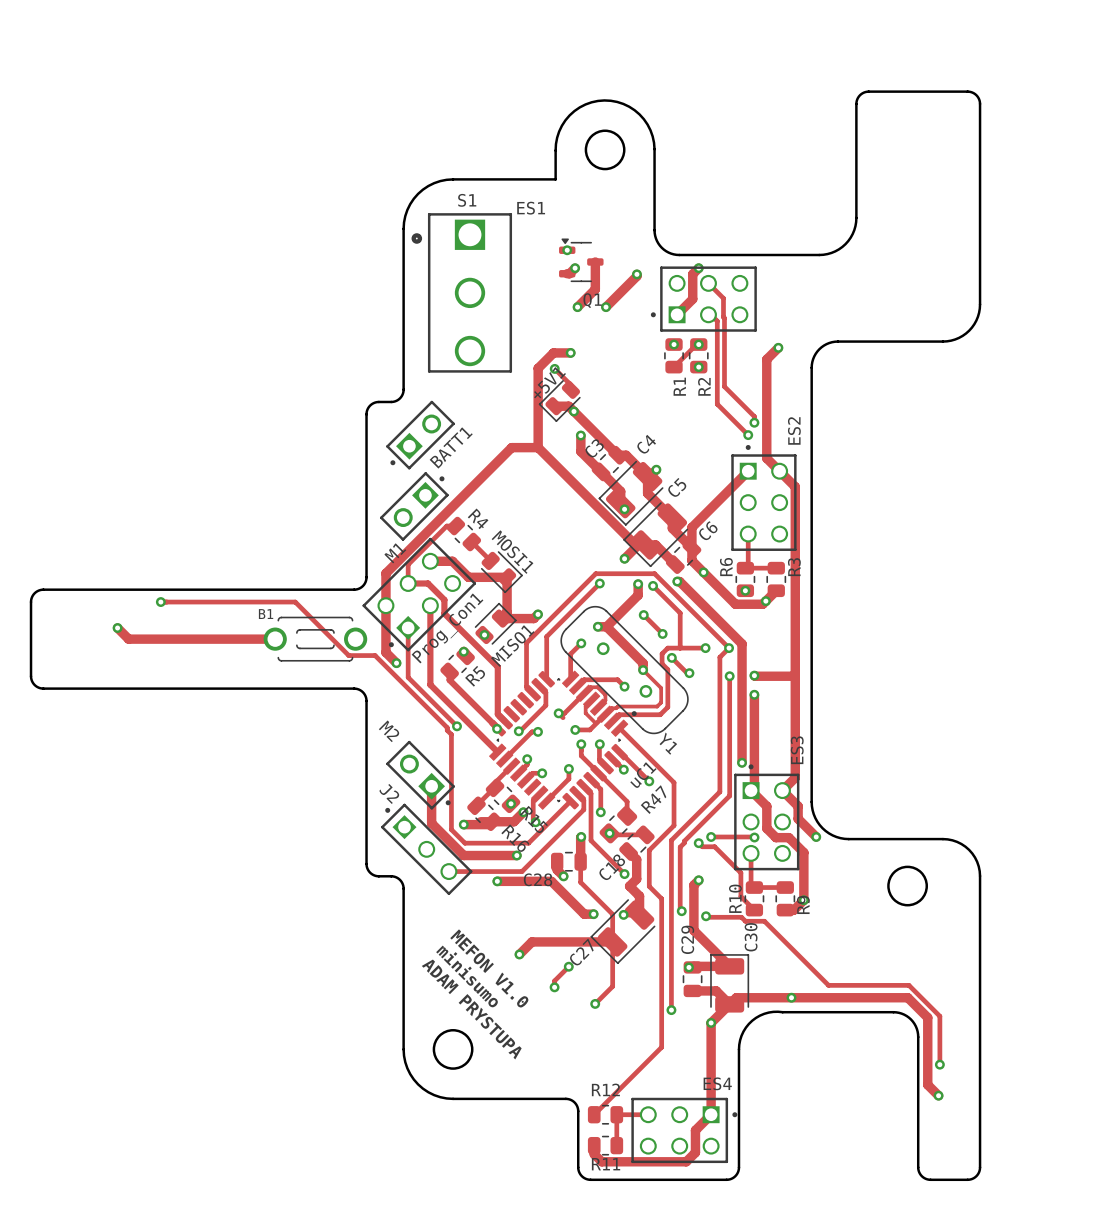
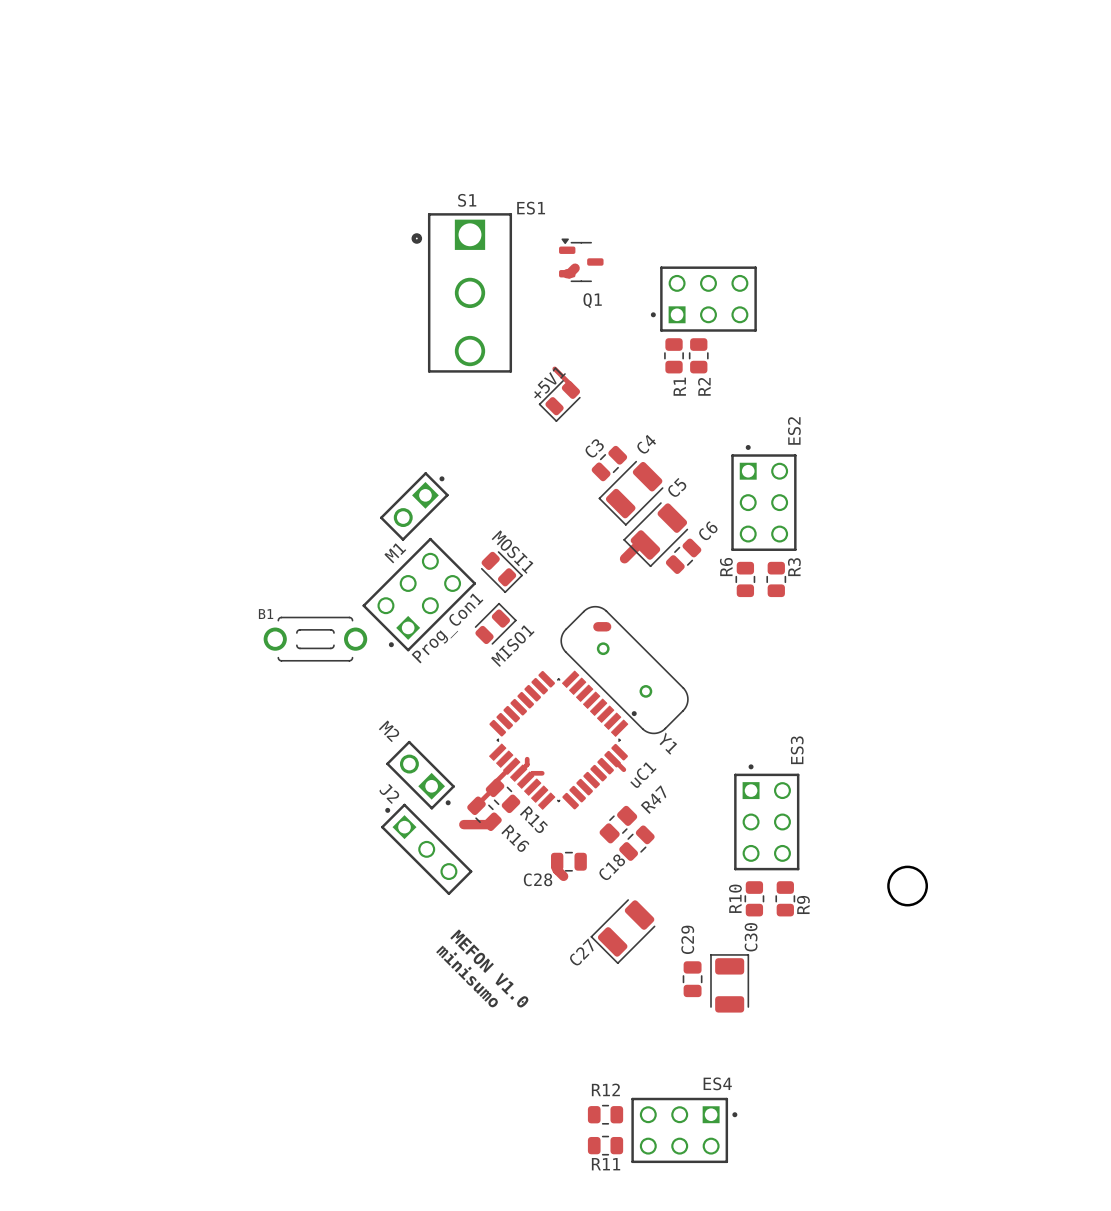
board edge: (868, 91) (967, 91) (973, 93) (978, 97) (980, 103) (979, 308) (971, 327) (955, 339) (942, 341) (835, 341) (821, 347) (813, 359) (811, 806) (819, 825) (836, 837) (848, 839) (947, 839) (965, 846) (977, 861) (980, 876) (979, 1170) (975, 1177) (967, 1179) (928, 1179) (923, 1177) (919, 1172) (918, 1034) (914, 1023) (908, 1017) (893, 1012) (778, 1011) (768, 1012) (755, 1017) (745, 1027) (740, 1040) (738, 1167) (735, 1176) (726, 1179) (587, 1179) (581, 1176) (578, 1169) (578, 1109) (572, 1100) (565, 1098) (446, 1098) (434, 1095) (422, 1088) (413, 1079) (407, 1068) (403, 1049) (403, 887) (397, 878) (374, 875) (370, 872) (366, 866) (366, 700) (362, 692) (354, 688) (40, 688) (34, 684) (31, 677) (31, 598) (35, 592) (43, 589) (354, 589) (360, 588) (364, 583) (366, 577) (366, 412) (372, 403) (395, 401) (399, 398) (403, 392) (404, 222) (407, 209) (418, 193) (434, 183) (446, 179) (555, 179) (555, 144) (559, 131) (565, 120) (574, 111) (585, 104) (597, 100) (610, 100) (623, 103) (634, 110) (643, 119) (650, 130) (654, 149) (654, 233) (658, 243) (666, 251) (679, 255) (827, 254) (845, 244) (855, 226) (856, 102) (859, 95) (868, 91) -> none
round board edge: [584, 129, 626, 171] -> none
via: (567, 250) -> none
track: (595, 261) (595, 289) (577, 307) -> none
via: (575, 268) -> none
track: (698, 268) (692, 274) (692, 299) (677, 314) -> none
via: (698, 268) -> none
track: (636, 274) (606, 307) -> none
via: (636, 274) -> none
track: (708, 283) (723, 298) (724, 386) (754, 416) (754, 422) -> none
via: (577, 307) -> none
via: (606, 307) -> none
track: (708, 314) (717, 321) (717, 404) (748, 435) -> none
via: (674, 344) -> none
track: (698, 344) (674, 367) -> none
via: (698, 344) -> none
track: (778, 347) (766, 359) (766, 458) (795, 486) (795, 777) (782, 790) (798, 806) (798, 818) (816, 836) -> none
via: (778, 347) -> none
track: (570, 352) (553, 352) (538, 368) (538, 447) -> none
via: (570, 352) -> none
via: (698, 367) -> none
via: (554, 368) -> none
track: (554, 406) (568, 406) (617, 455) (626, 455) (647, 476) -> none
via: (573, 411) -> none
via: (754, 422) -> none
BATT1: (420, 435) -> none
track: (580, 435) (580, 451) (620, 491) (620, 503) -> none
via: (580, 435) -> none
via: (748, 435) -> none
track: (538, 447) (635, 545) (655, 545) (675, 564) -> none
track: (538, 447) (511, 447) (385, 573) (385, 652) (396, 663) -> none
via: (656, 469) -> none
track: (748, 471) (691, 527) (691, 560) (735, 604) (762, 604) (776, 590) -> none
track: (647, 476) (647, 493) (672, 518) (672, 528) (691, 547) -> none
via: (624, 509) -> none
track: (455, 526) (446, 526) (408, 564) (408, 583) (428, 583) (444, 599) (444, 613) (497, 666) (497, 714) (504, 721) -> none
R4: (463, 534) -> none
track: (748, 534) (748, 565) (745, 568) (776, 568) -> none
track: (471, 542) (490, 560) -> none
via: (624, 558) -> none
track: (430, 561) (452, 561) (468, 577) (507, 577) (507, 612) (500, 618) (533, 618) (538, 614) -> none
via: (703, 572) -> none
track: (677, 581) (679, 581) (742, 643) (742, 762) -> none
via: (677, 581) -> none
track: (599, 583) (546, 636) (546, 679) -> none
via: (599, 583) -> none
track: (638, 584) (638, 595) (606, 626) (643, 663) (643, 670) (661, 688) (661, 702) (657, 706) (611, 708) (595, 722) (585, 713) (585, 706) (591, 700) -> none
via: (638, 584) -> none
track: (653, 585) (680, 613) (680, 648) -> none
via: (653, 585) -> none
via: (745, 590) -> none
via: (765, 601) -> none
track: (160, 602) (295, 602) (348, 655) (375, 655) (447, 727) (451, 734) (451, 829) (464, 843) (528, 843) (570, 801) -> none
via: (160, 602) -> none
track: (430, 605) (430, 684) (497, 752) -> none
via: (538, 614) -> none
track: (643, 615) (662, 633) -> none
via: (643, 615) -> none
via: (597, 626) -> none
track: (408, 627) (408, 677) (457, 726) -> none
track: (117, 628) (128, 639) (275, 639) -> none
via: (117, 628) -> none
via: (662, 633) -> none
via: (484, 634) -> none
track: (581, 643) (570, 654) (570, 679) -> none
via: (581, 643) -> none
track: (705, 648) (667, 648) (662, 653) (662, 663) (667, 669) (667, 707) (660, 714) (619, 714) (612, 721) -> none
via: (705, 648) -> none
via: (729, 648) -> none
via: (463, 651) -> none
track: (671, 657) (687, 673) (689, 673) -> none
via: (671, 657) -> none
via: (396, 663) -> none
R5: (457, 663) -> none
via: (643, 670) -> none
track: (449, 671) (449, 680) (497, 728) -> none
via: (689, 673) -> none
track: (754, 675) (795, 676) -> none
via: (754, 675) -> none
track: (729, 676) (729, 795) (680, 847) (680, 909) (681, 911) -> none
via: (729, 676) -> none
track: (539, 686) (545, 692) (545, 705) (518, 731) -> none
track: (577, 686) (584, 679) (617, 679) (624, 686) -> none
via: (624, 686) -> none
track: (532, 693) (526, 687) (526, 642) (595, 573) (654, 573) (729, 648) (719, 657) (719, 791) (671, 840) (671, 1010) -> none
track: (754, 694) (754, 787) (751, 790) (766, 806) (766, 828) (775, 837) (788, 837) (803, 852) (803, 900) (793, 910) (785, 910) -> none
via: (754, 694) -> none
track: (598, 707) (605, 700) (605, 695) (597, 687) (590, 687) (564, 713) (558, 713) (563, 717) -> none
via: (558, 713) -> none
track: (605, 714) (589, 729) (575, 729) -> none
via: (457, 726) -> none
via: (497, 728) -> none
track: (619, 728) (674, 782) (674, 825) (649, 850) (649, 886) (661, 898) (661, 1047) (594, 1114) -> none
via: (575, 729) -> none
via: (518, 731) -> none
track: (538, 731) (532, 731) (504, 759) -> none
via: (538, 731) -> none
track: (581, 744) (581, 755) (627, 801) (627, 815) -> none
via: (581, 744) -> none
track: (599, 744) (599, 759) (605, 766) -> none
via: (599, 744) -> none
track: (619, 752) (649, 781) -> none
via: (527, 759) -> none
via: (742, 762) -> none
track: (568, 768) (568, 778) (546, 801) -> none
via: (568, 768) -> none
via: (623, 769) -> none
via: (542, 773) -> none
track: (591, 780) (600, 789) (600, 812) -> none
via: (649, 781) -> none
track: (431, 786) (431, 823) (463, 855) (516, 855) -> none
track: (584, 787) (591, 793) (591, 840) (624, 874) -> none
track: (539, 794) (533, 800) (533, 819) (535, 822) -> none
track: (577, 794) (583, 800) (583, 809) (521, 871) (448, 871) -> none
via: (511, 803) -> none
track: (523, 812) (513, 821) (480, 821) -> none
via: (523, 812) -> none
via: (600, 812) -> none
via: (535, 822) -> none
via: (463, 824) -> none
track: (609, 833) (645, 834) -> none
via: (609, 833) -> none
track: (581, 836) (580, 882) (612, 914) (612, 986) (595, 1003) -> none
via: (581, 836) -> none
track: (711, 836) (754, 837) -> none
via: (711, 836) -> none
via: (816, 836) -> none
via: (754, 837) -> none
track: (698, 843) (702, 846) (714, 846) (740, 872) (740, 896) (754, 910) -> none
via: (698, 843) -> none
track: (628, 851) (636, 859) (636, 879) (629, 886) (639, 896) (639, 915) (623, 915) -> none
track: (751, 853) (751, 884) (754, 887) (785, 887) -> none
via: (516, 855) -> none
via: (624, 874) -> none
via: (563, 876) -> none
track: (698, 880) (693, 885) (693, 930) (729, 966) (692, 967) -> none
via: (698, 880) -> none
track: (497, 881) (551, 881) (584, 914) (593, 914) -> none
via: (497, 881) -> none
via: (803, 900) -> none
via: (681, 911) -> none
via: (593, 914) -> none
via: (623, 914) -> none
track: (706, 916) (741, 917) (745, 921) (764, 921) (828, 985) (908, 985) (939, 1016) (939, 1064) -> none
via: (706, 916) -> none
track: (612, 941) (531, 941) (519, 954) -> none
via: (519, 954) -> none
track: (568, 966) (554, 980) (554, 987) -> none
via: (568, 966) -> none
via: (688, 967) -> none
via: (554, 987) -> none
track: (692, 990) (716, 990) (729, 1004) -> none
via: (791, 997) -> none
via: (595, 1003) -> none
text: ADAM PRYSTUPA (471, 1009) -> none
via: (671, 1010) -> none
via: (711, 1022) -> none
round board edge: [432, 1029, 474, 1070] -> none
via: (939, 1064) -> none
track: (938, 1095) (927, 1084) (927, 1017) (907, 997) (736, 997) (711, 1022) (711, 1114) (695, 1130) (695, 1152) (686, 1161) (601, 1161) (594, 1154) (594, 1145) -> none
via: (938, 1095) -> none
track: (648, 1114) (616, 1114) (616, 1145) -> none

